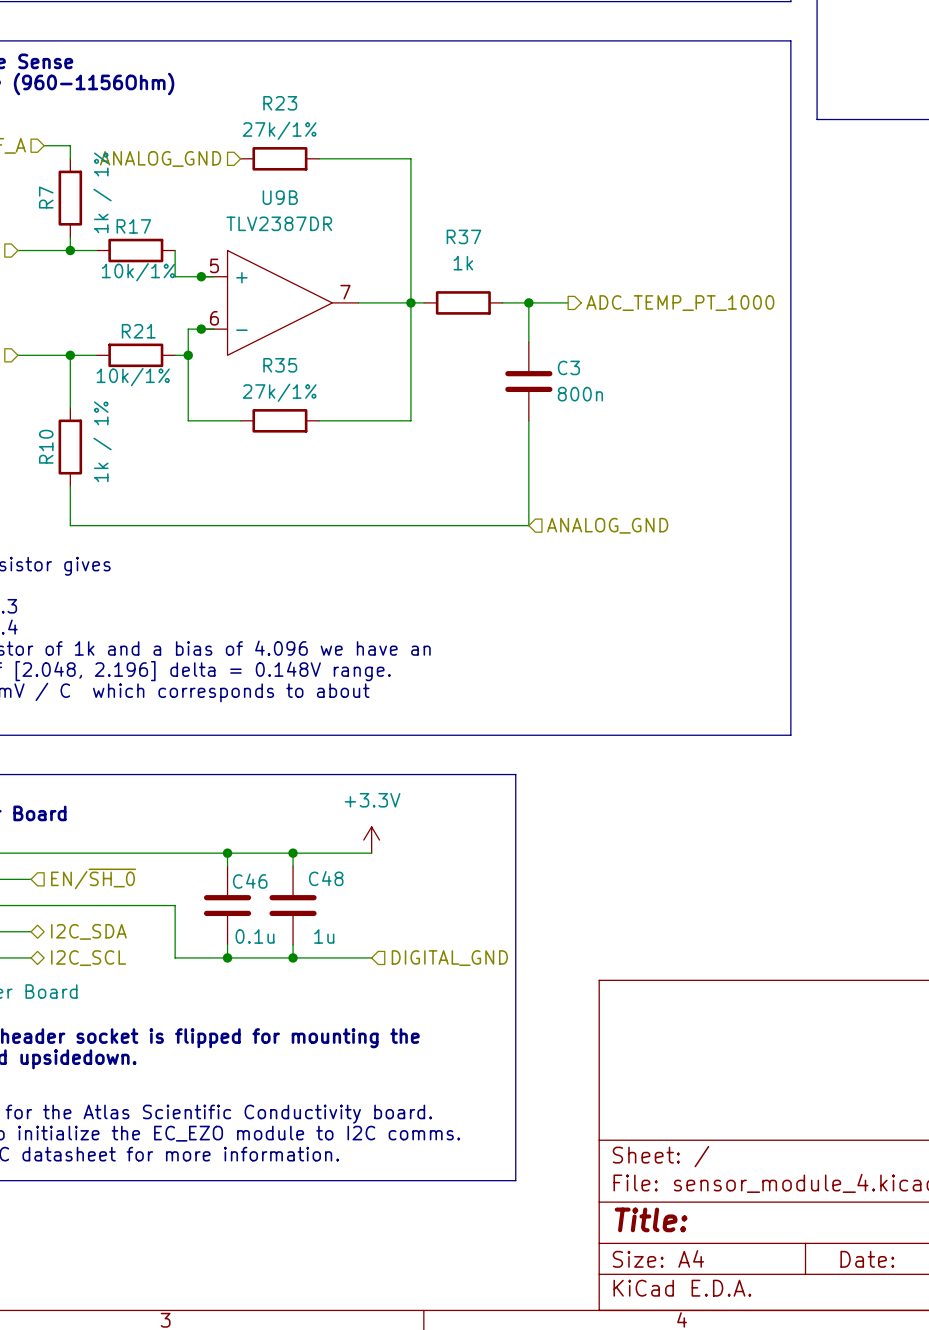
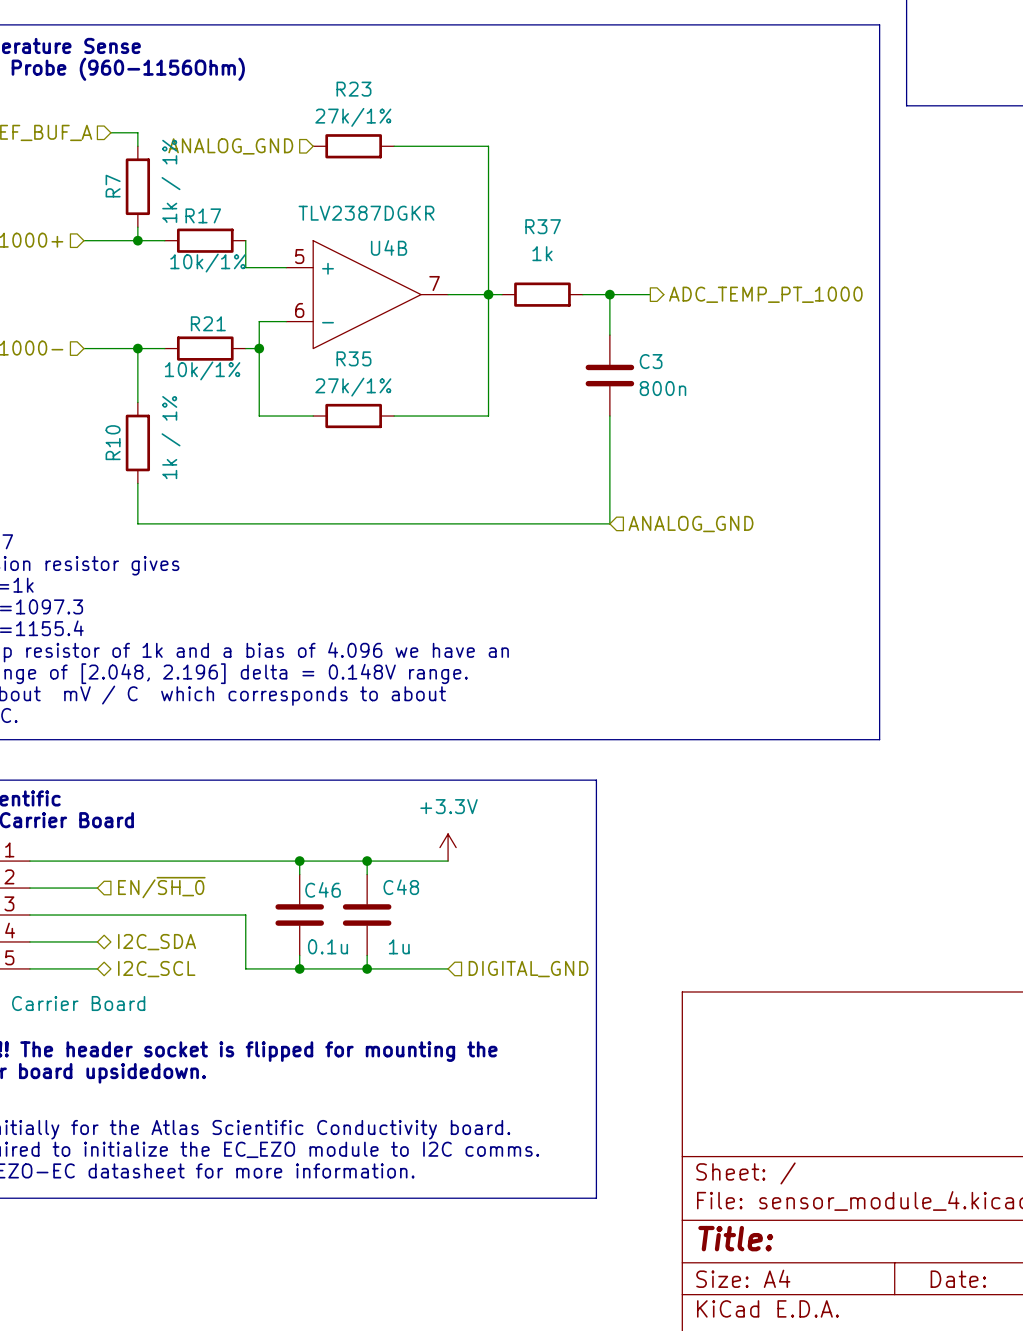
junction: (201, 276) -> none
U9B: TLV2387DR (279, 302) -> none
U4B: none -> TLV2387DGKR (367, 294)
junction: (201, 329) -> none

